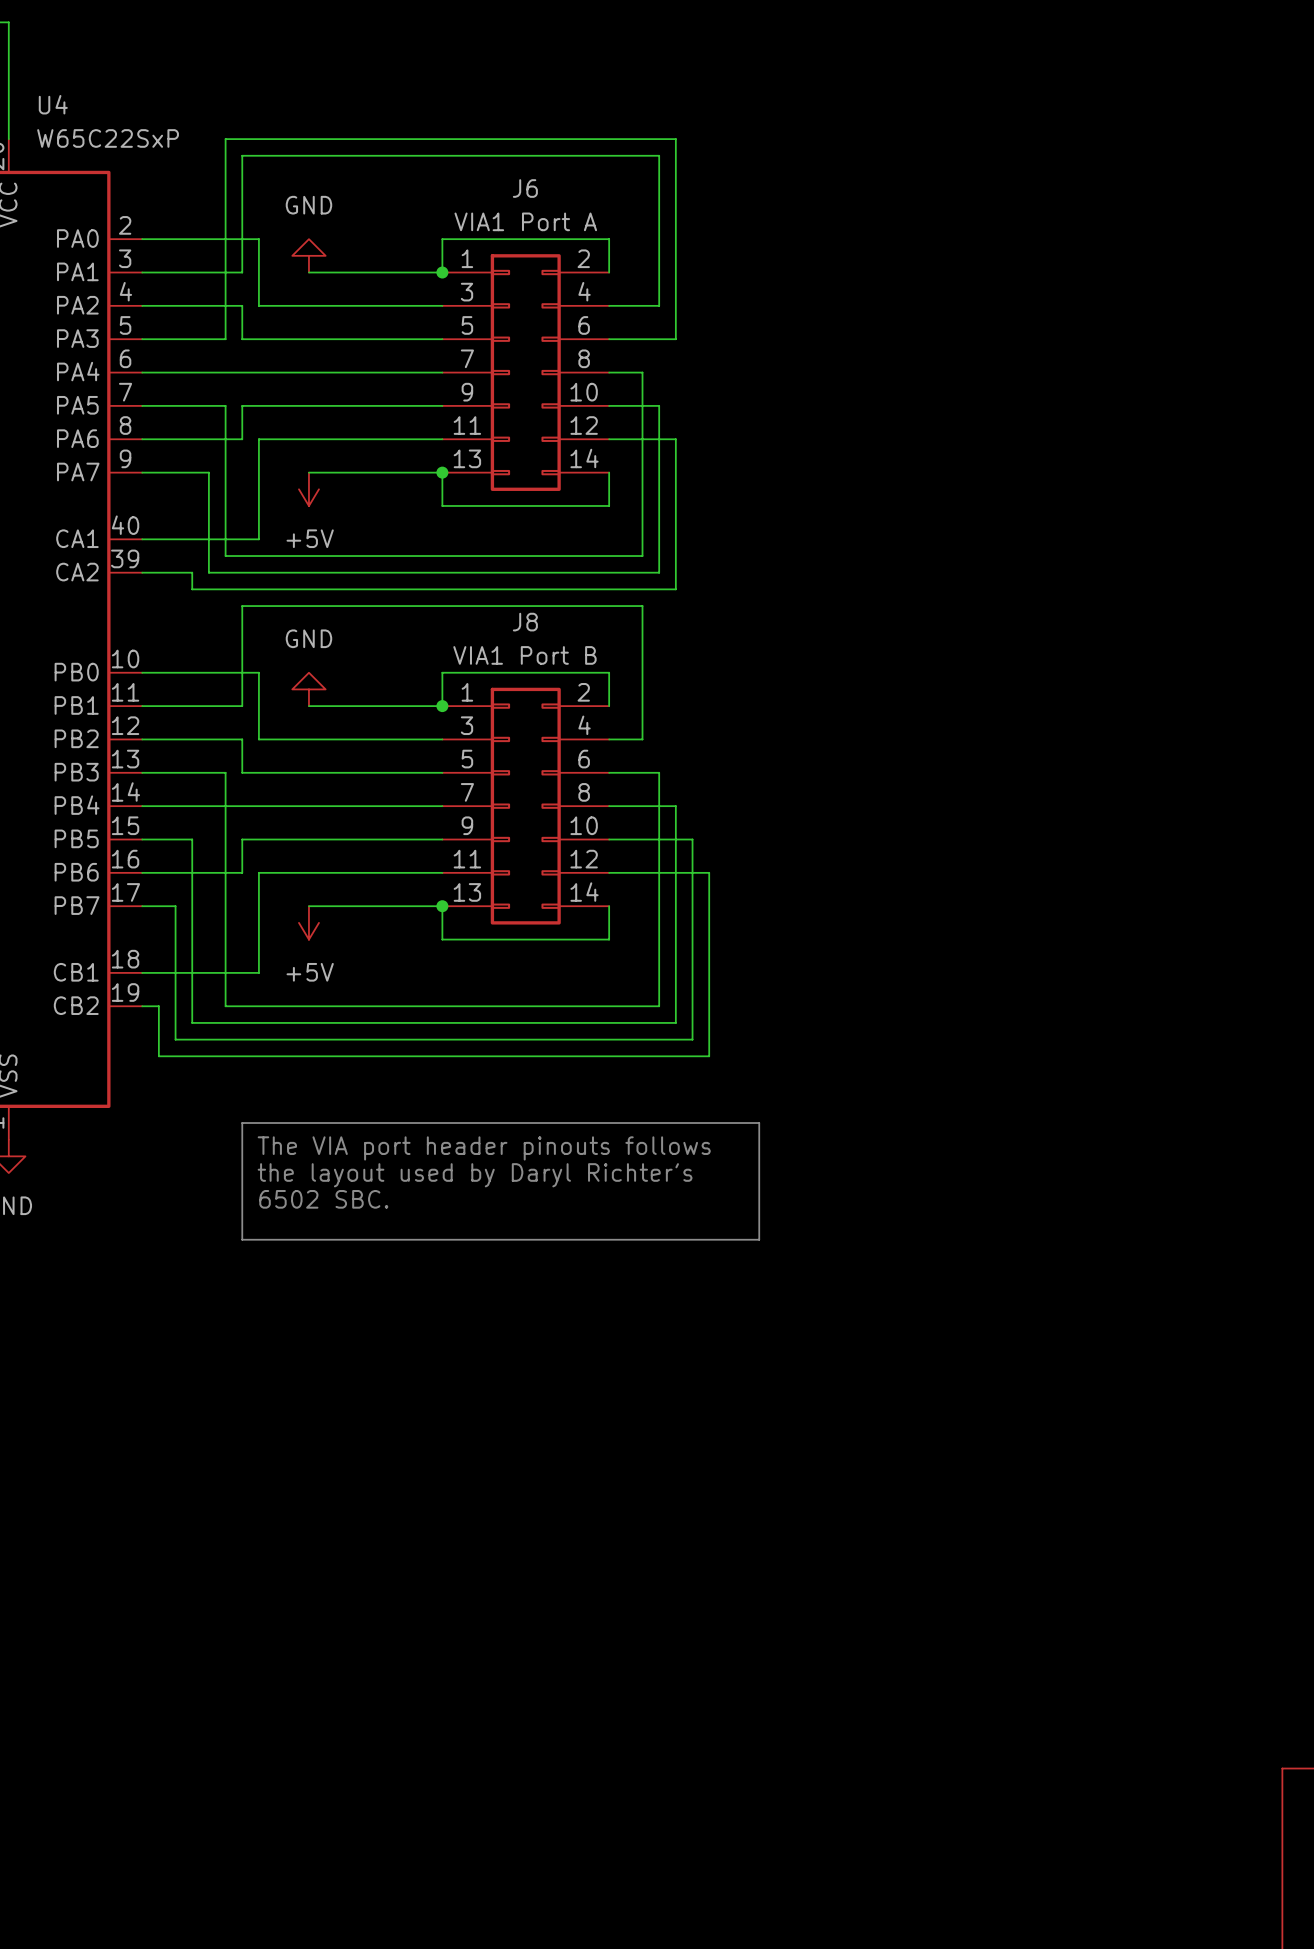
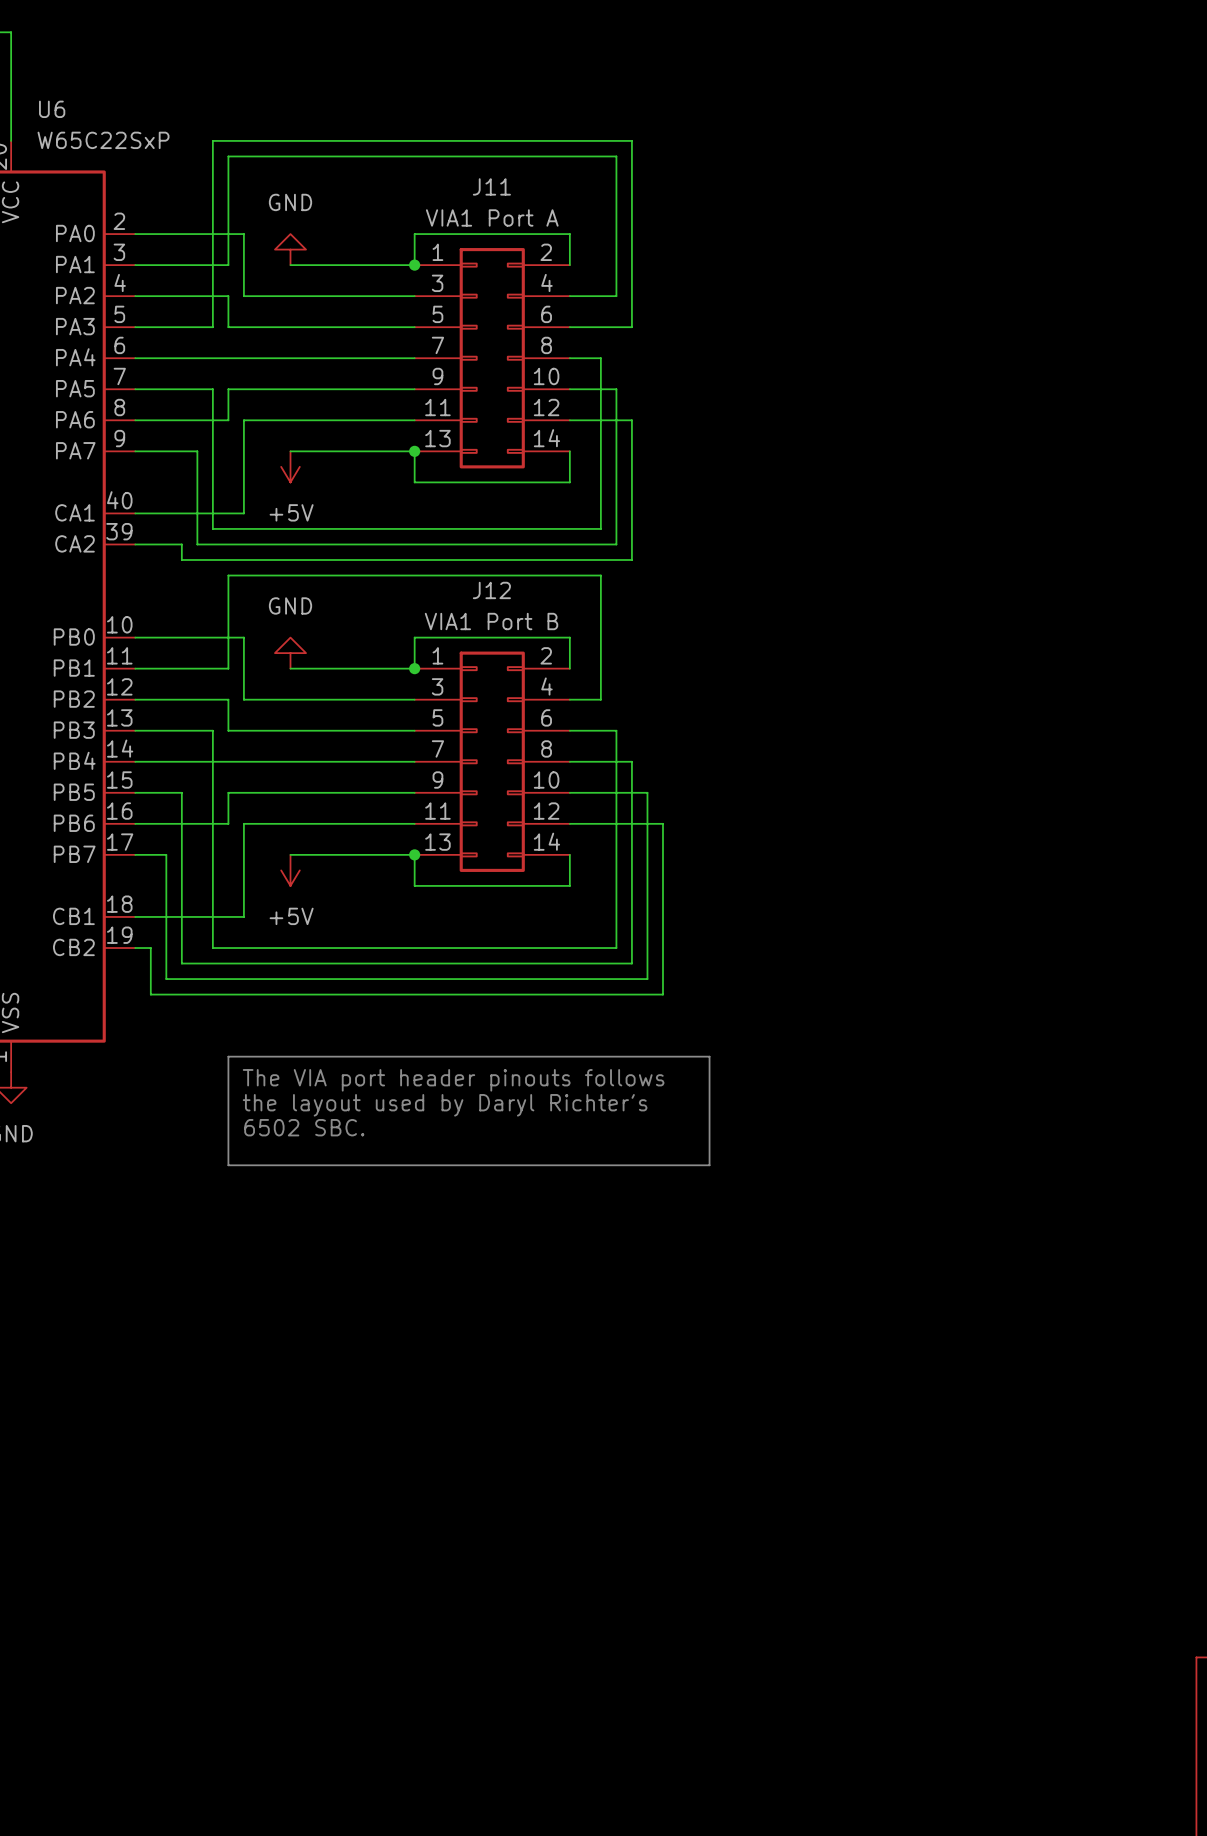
U4 name: U4 (53, 104) -> U6 (52, 109)
J6 name: J6 (525, 188) -> J11 (491, 186)
J8 name: J8 (525, 622) -> J12 (491, 590)

